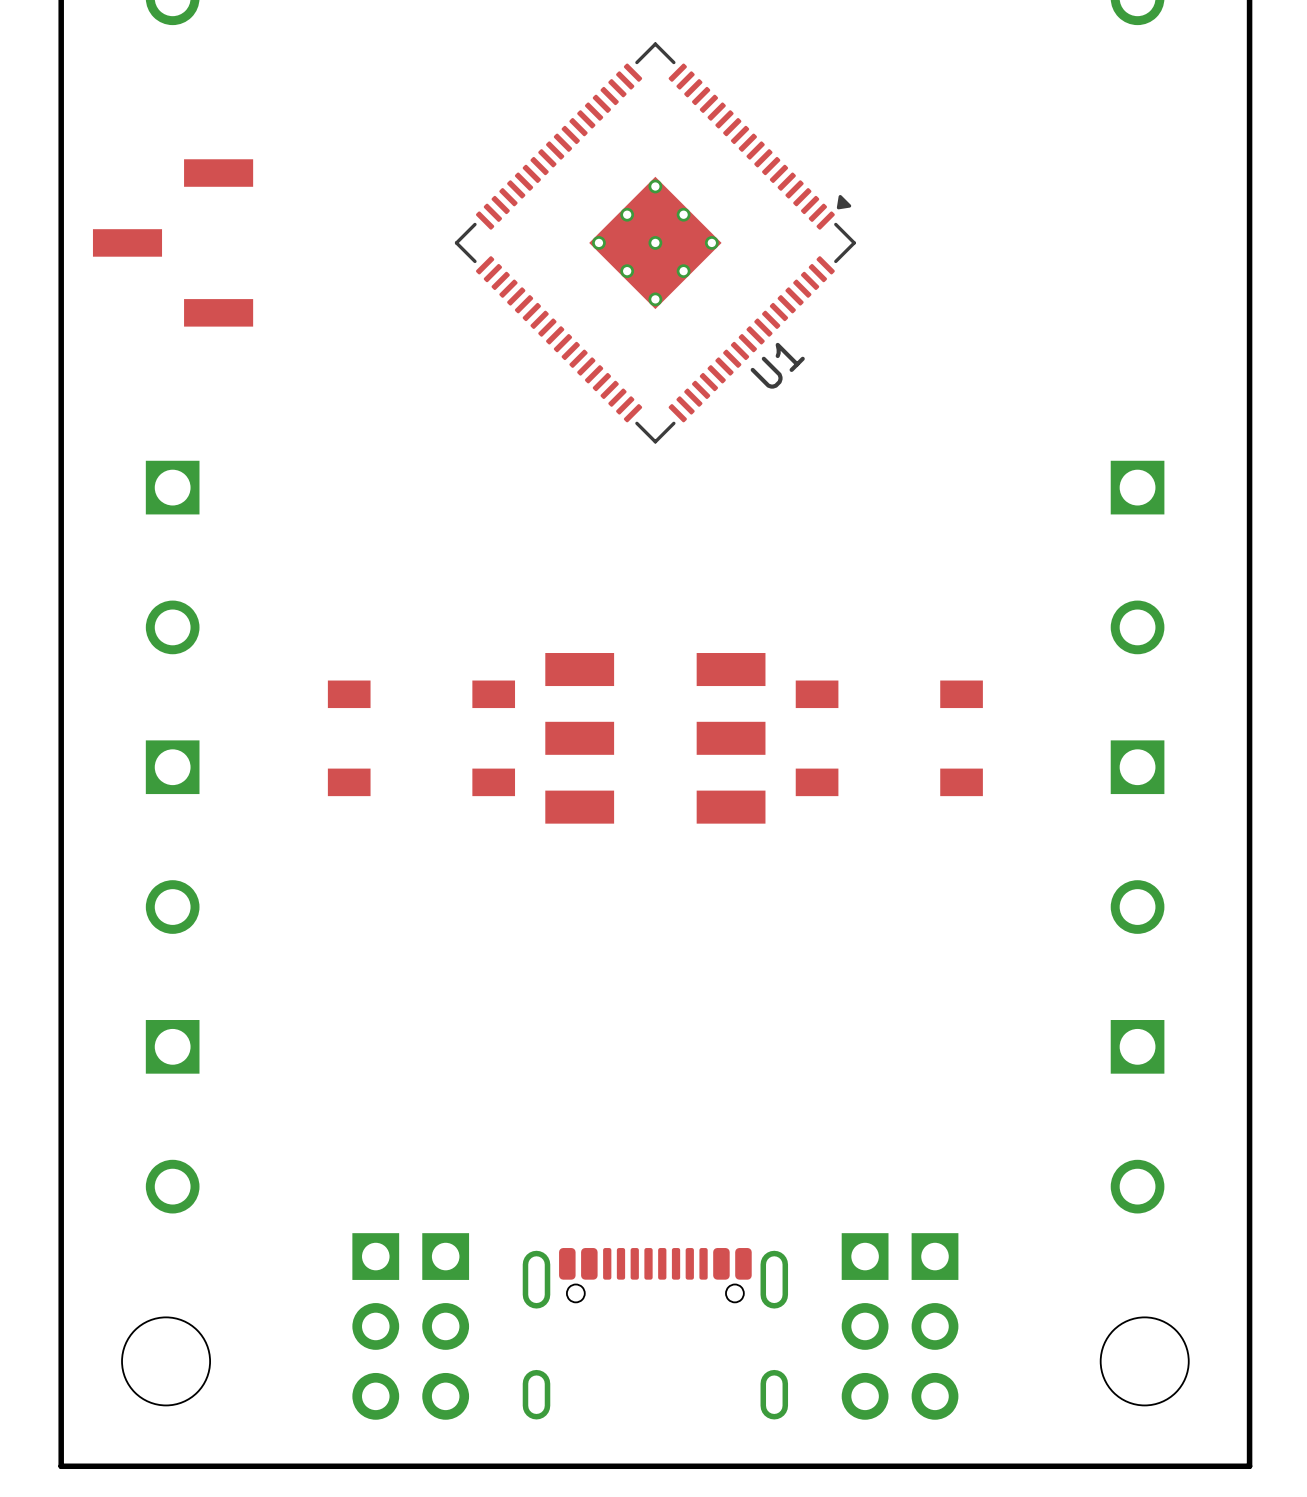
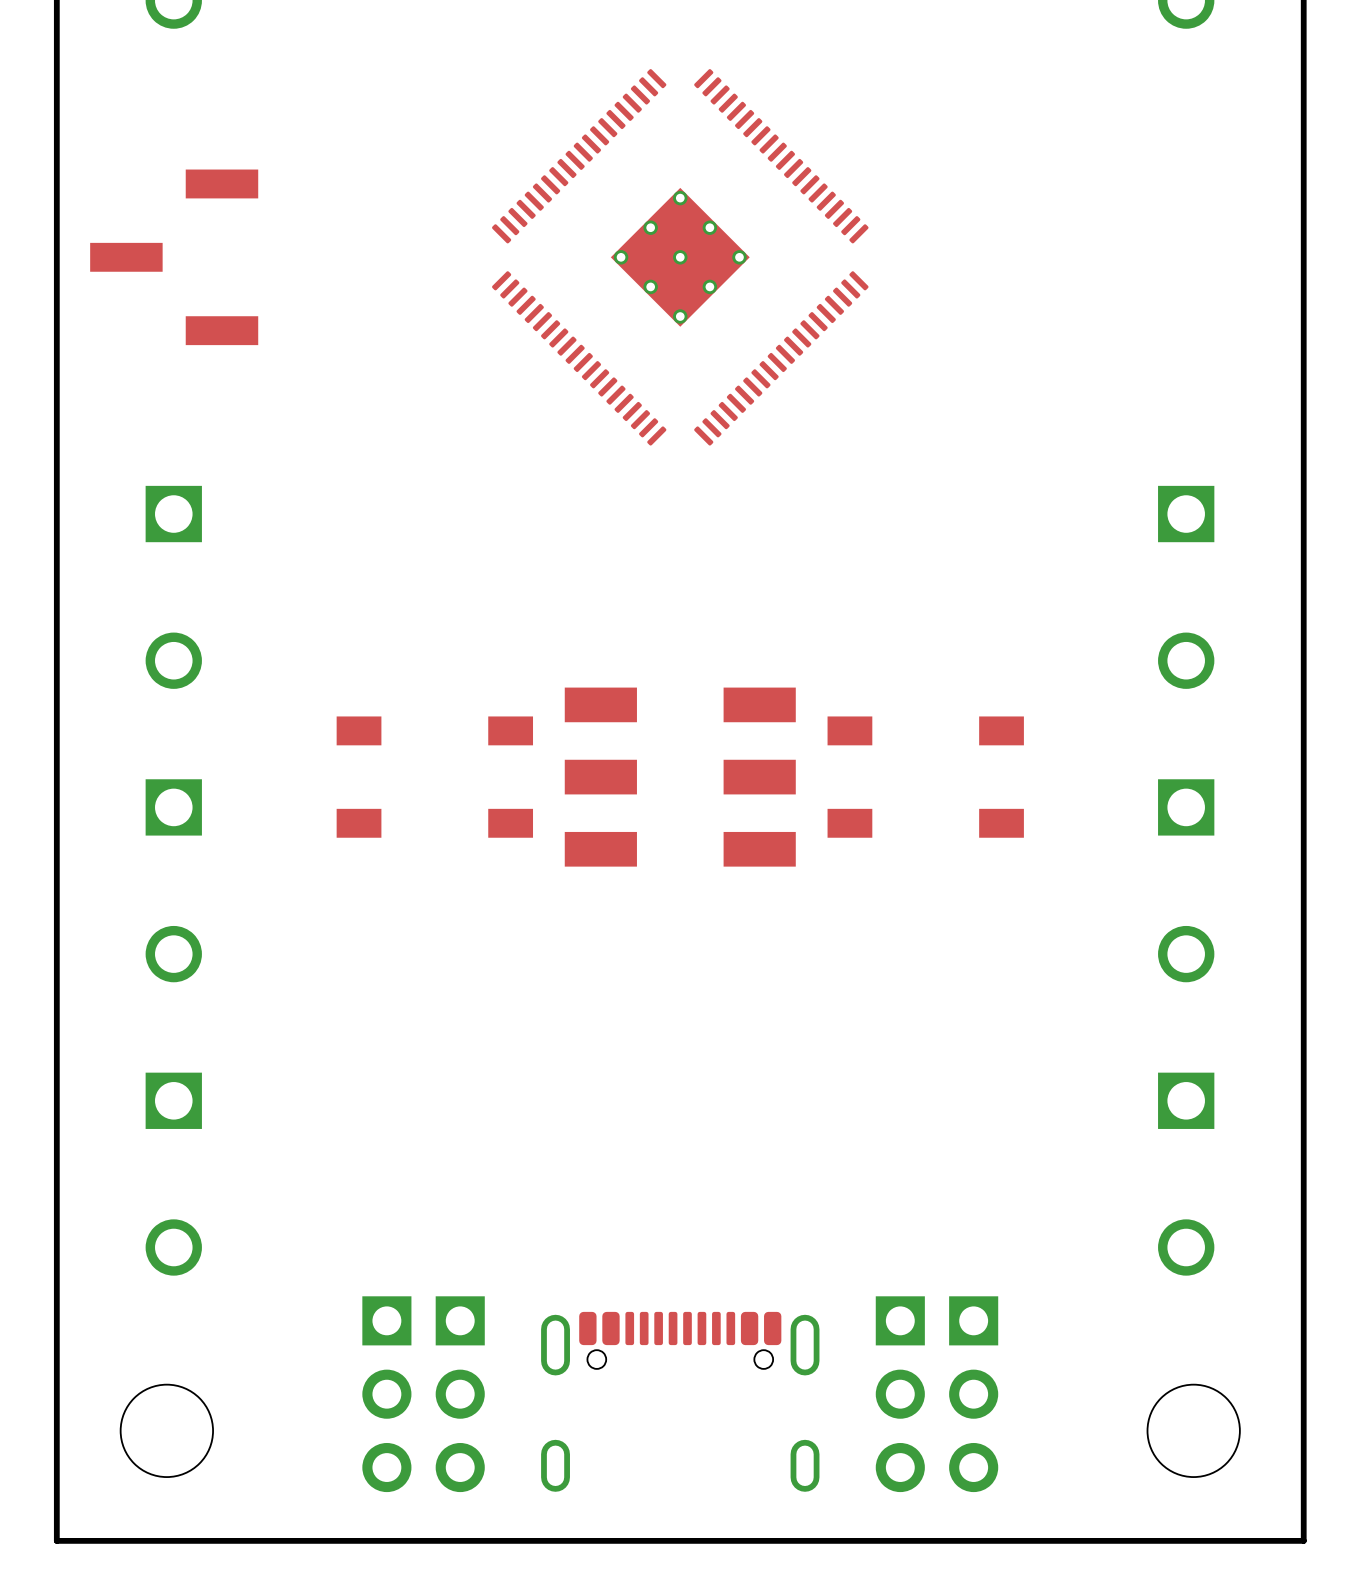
U1: (655, 242) -> none

